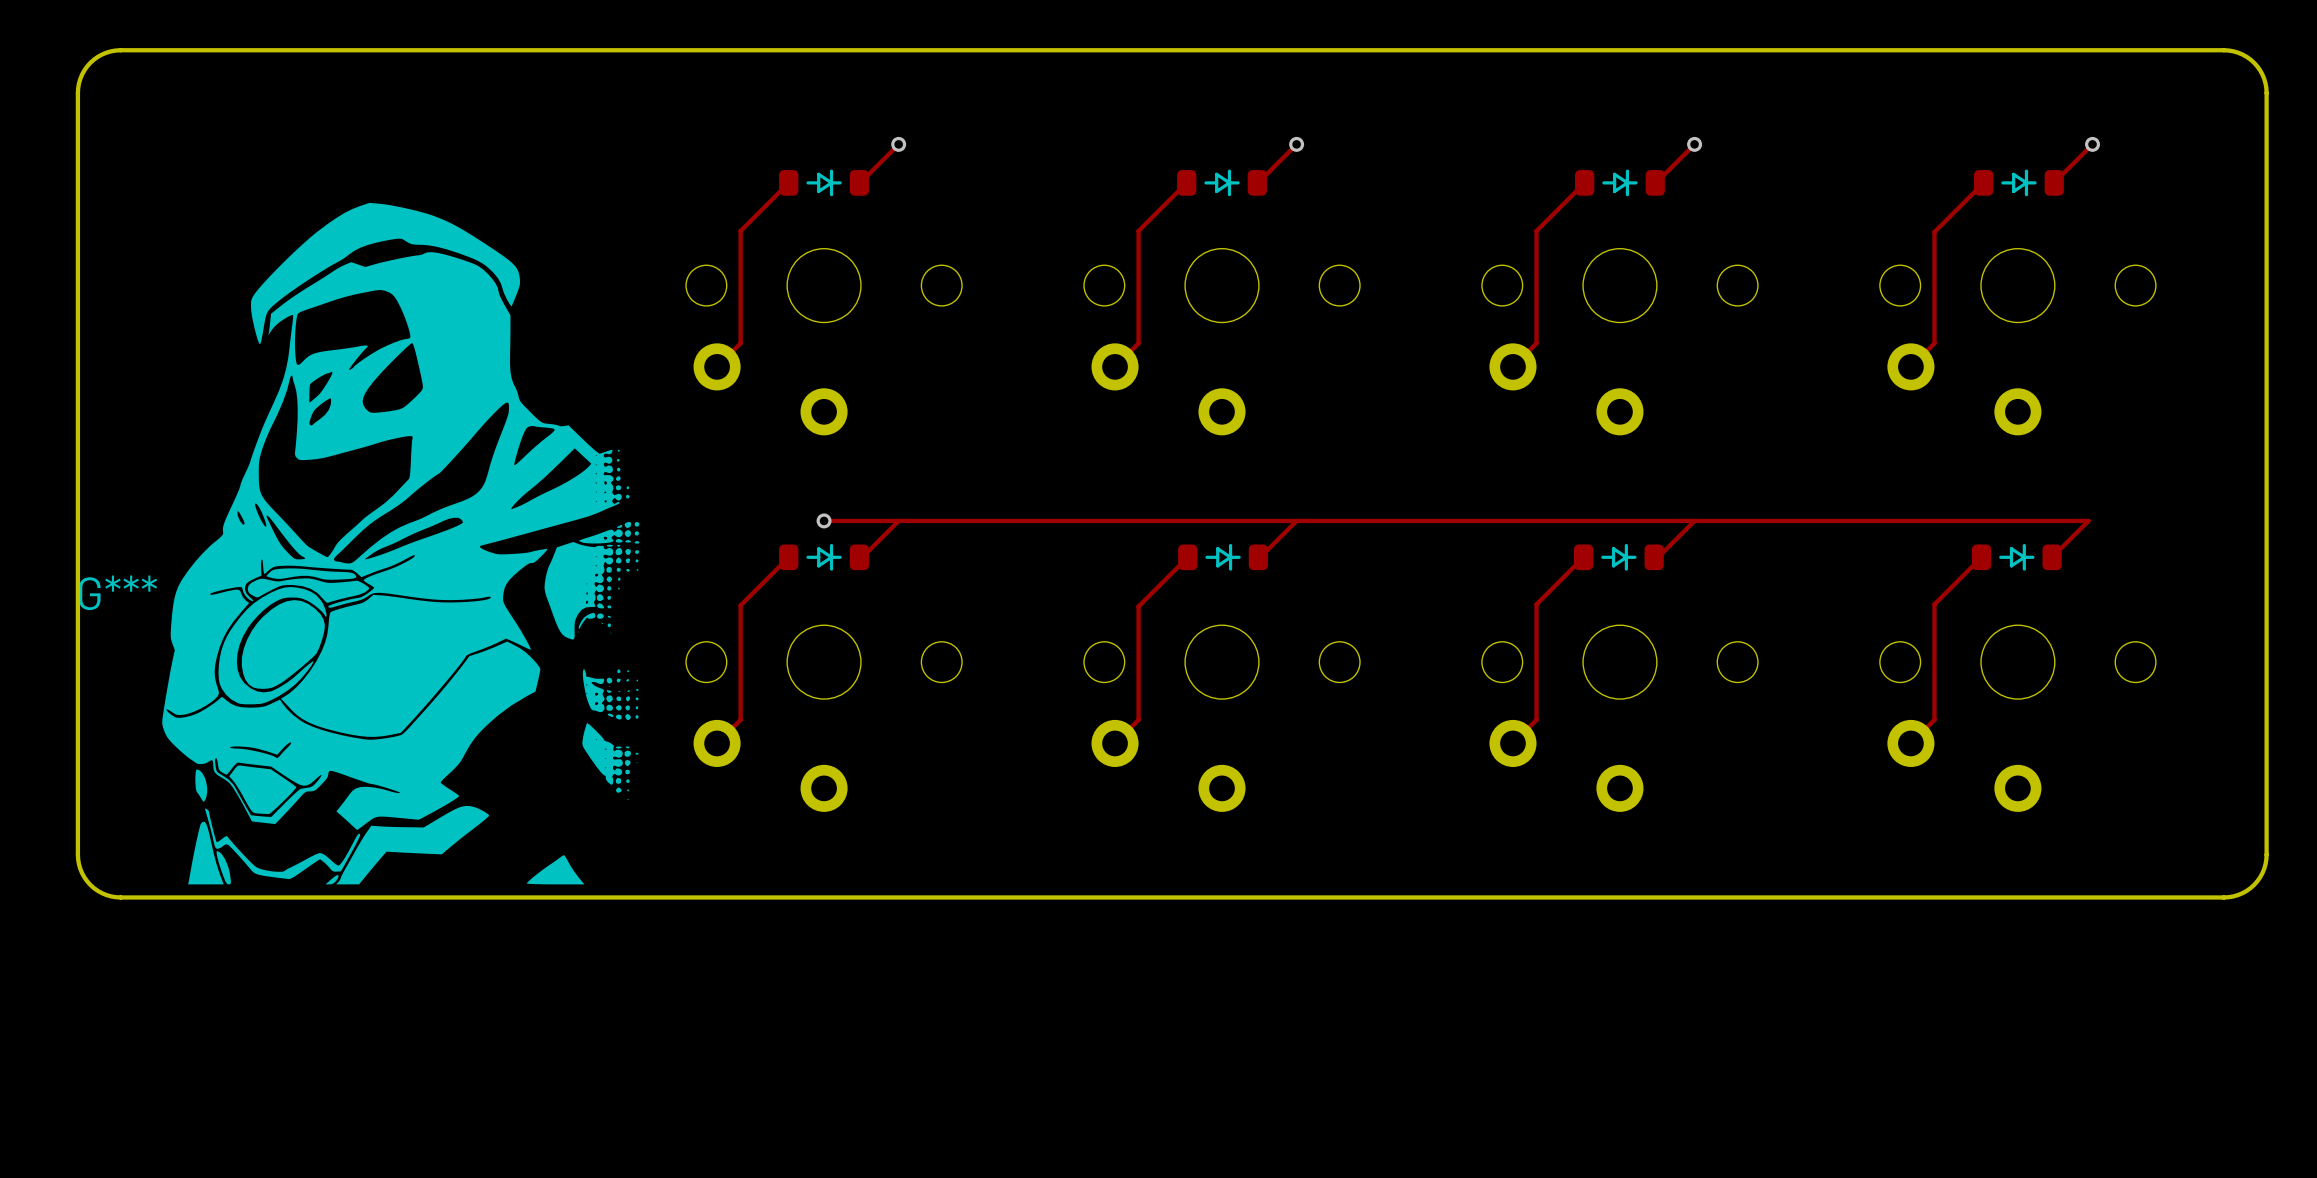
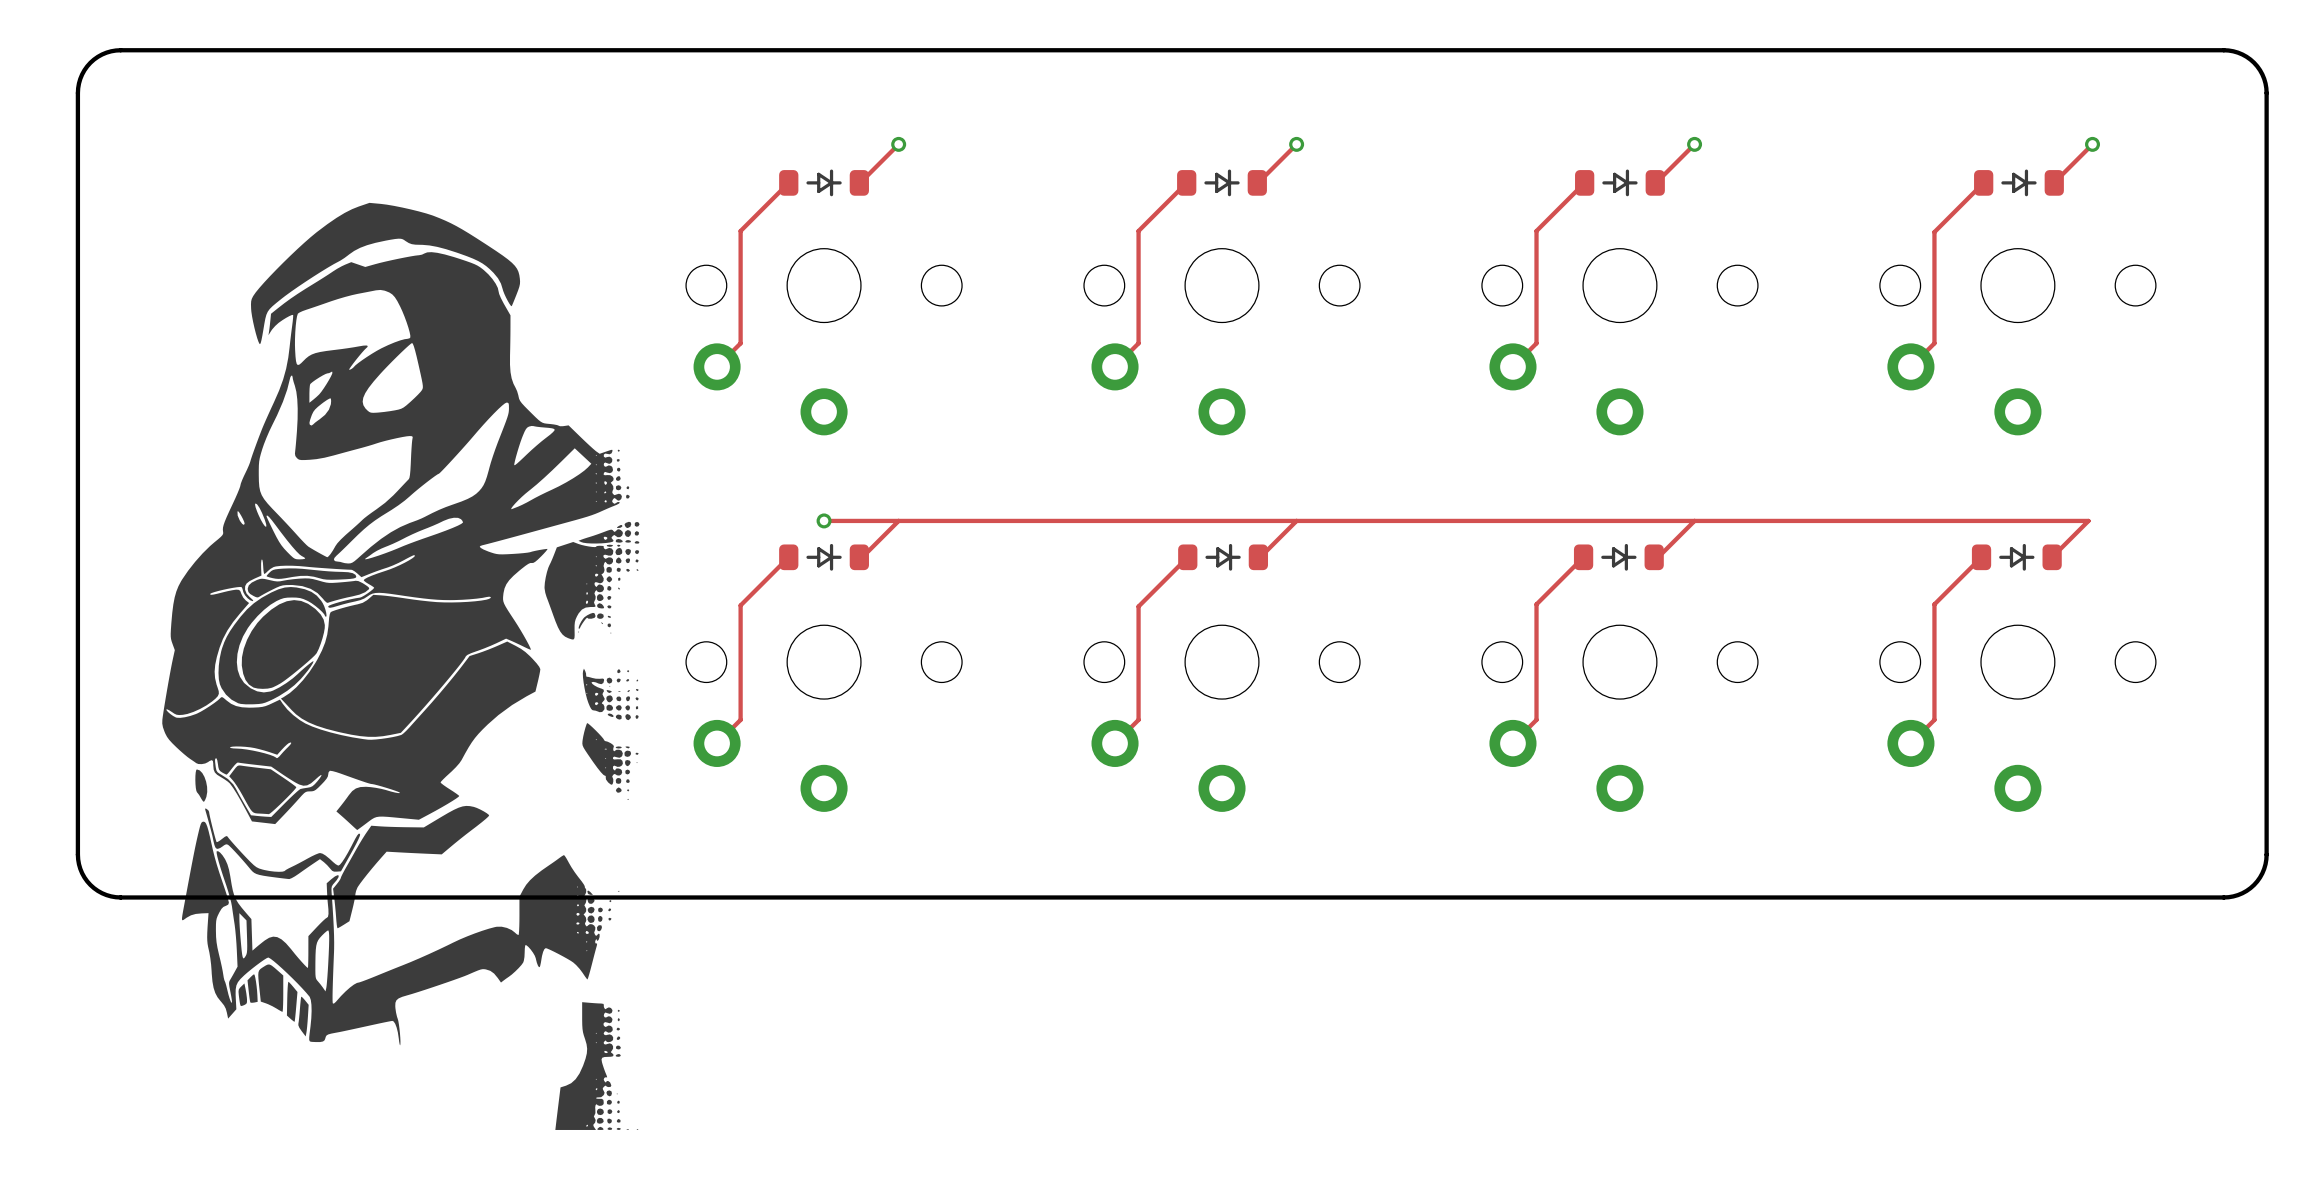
drawing: none -> [162, 202, 640, 1130]
G***: (400, 543) -> none

